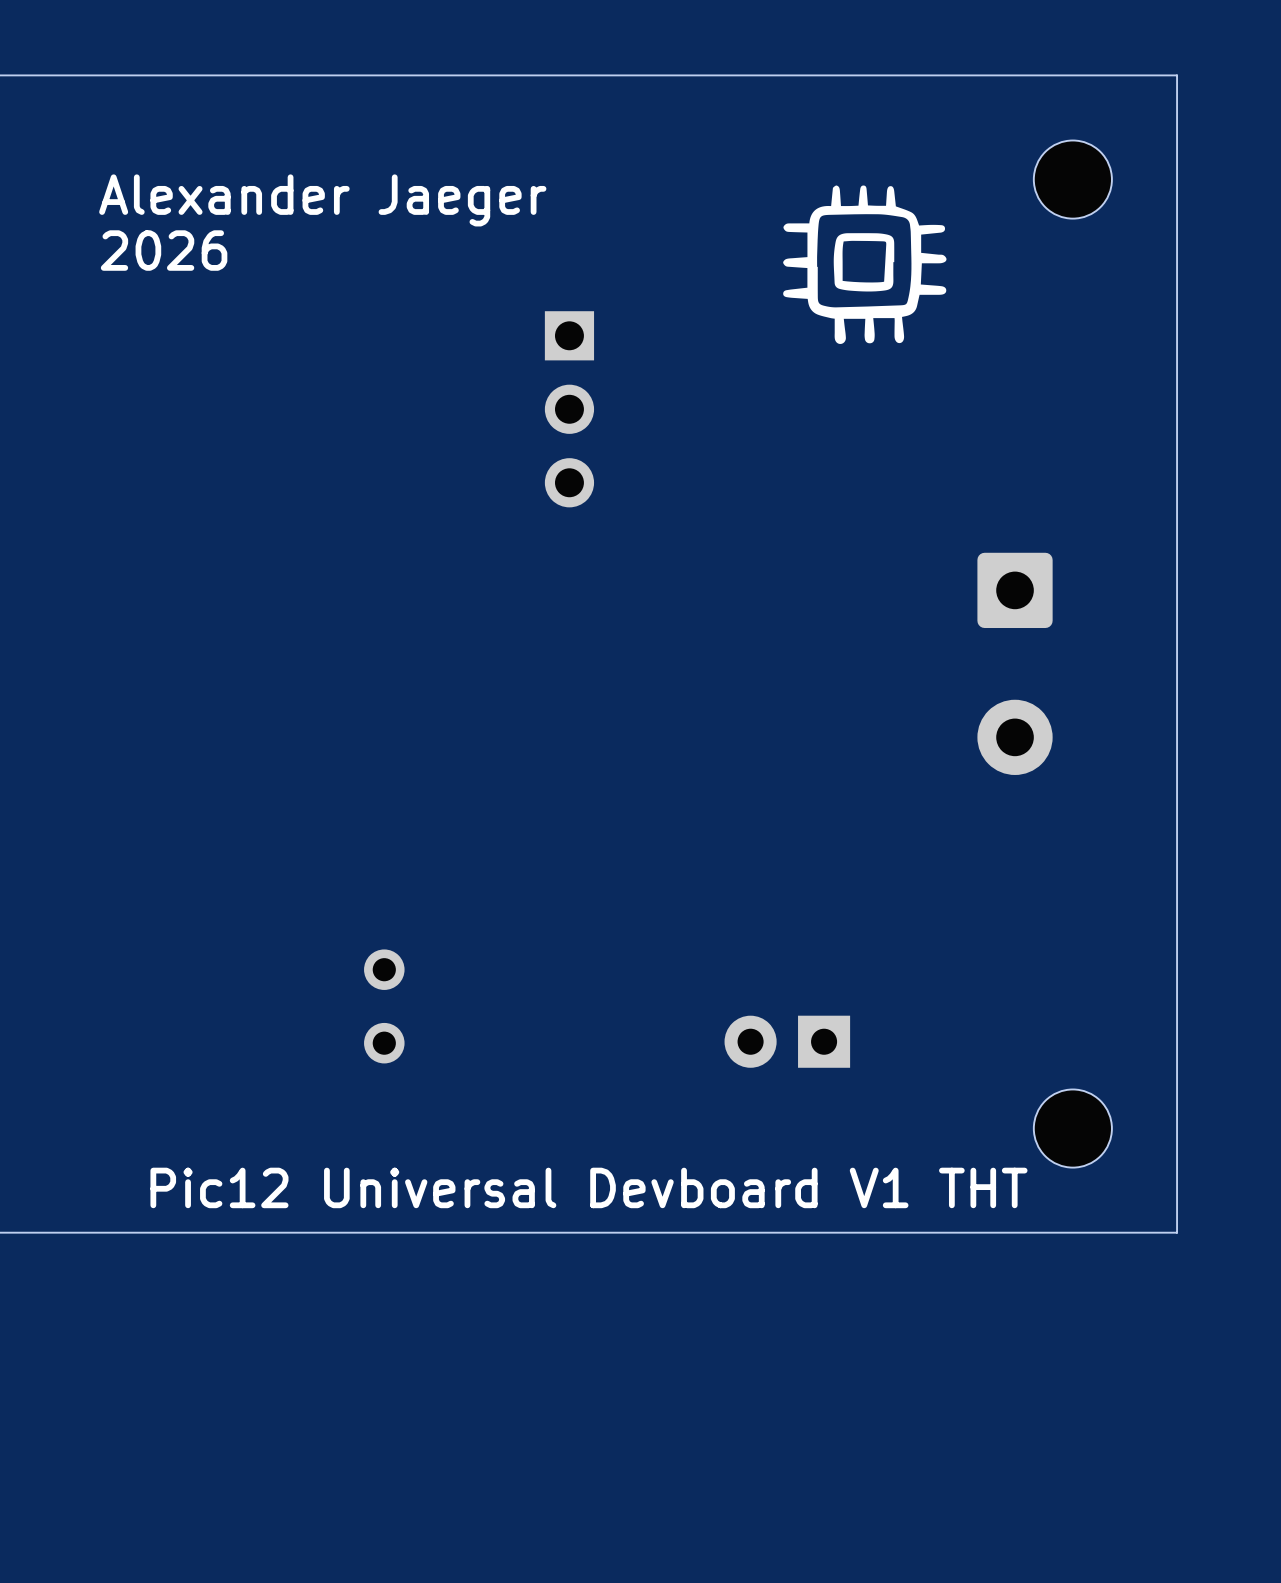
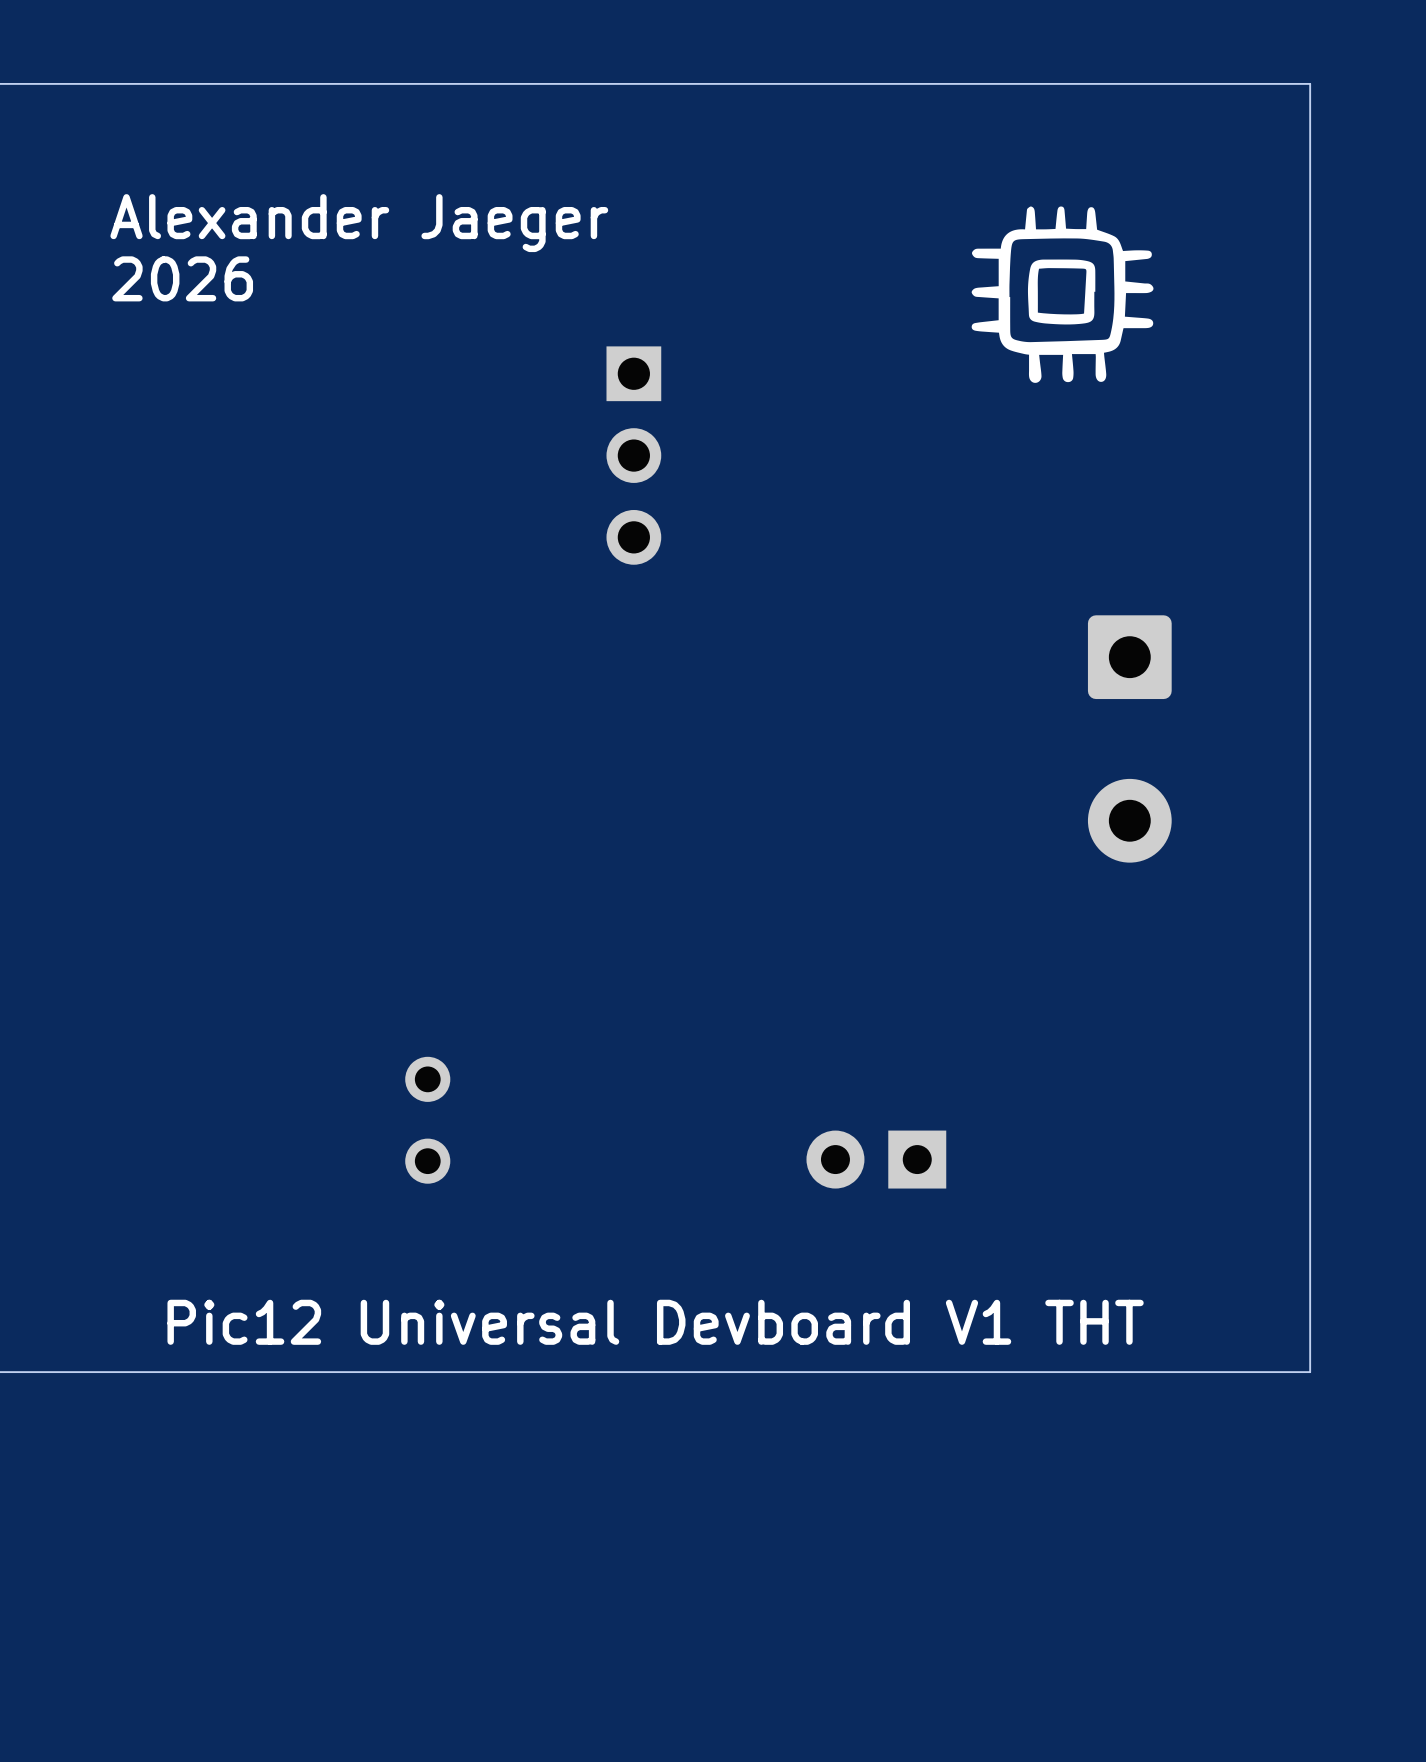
part: (1072, 179) -> none
drawing position: (864, 262) -> (1061, 292)
drawing position: (864, 264) -> (1062, 294)
part: (1072, 1128) -> none

